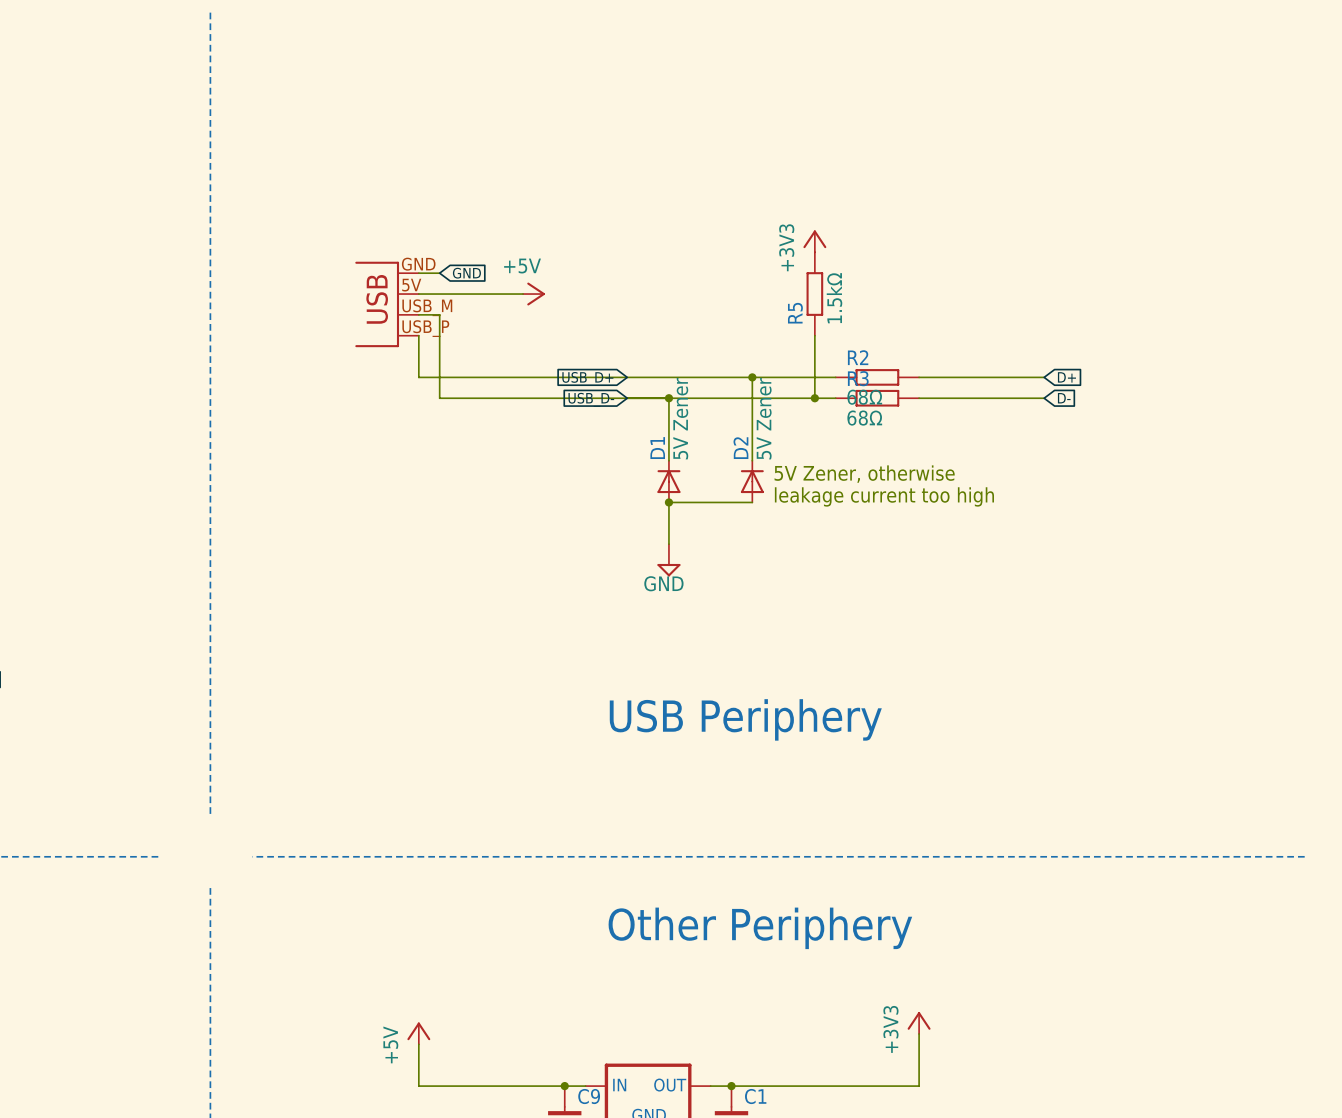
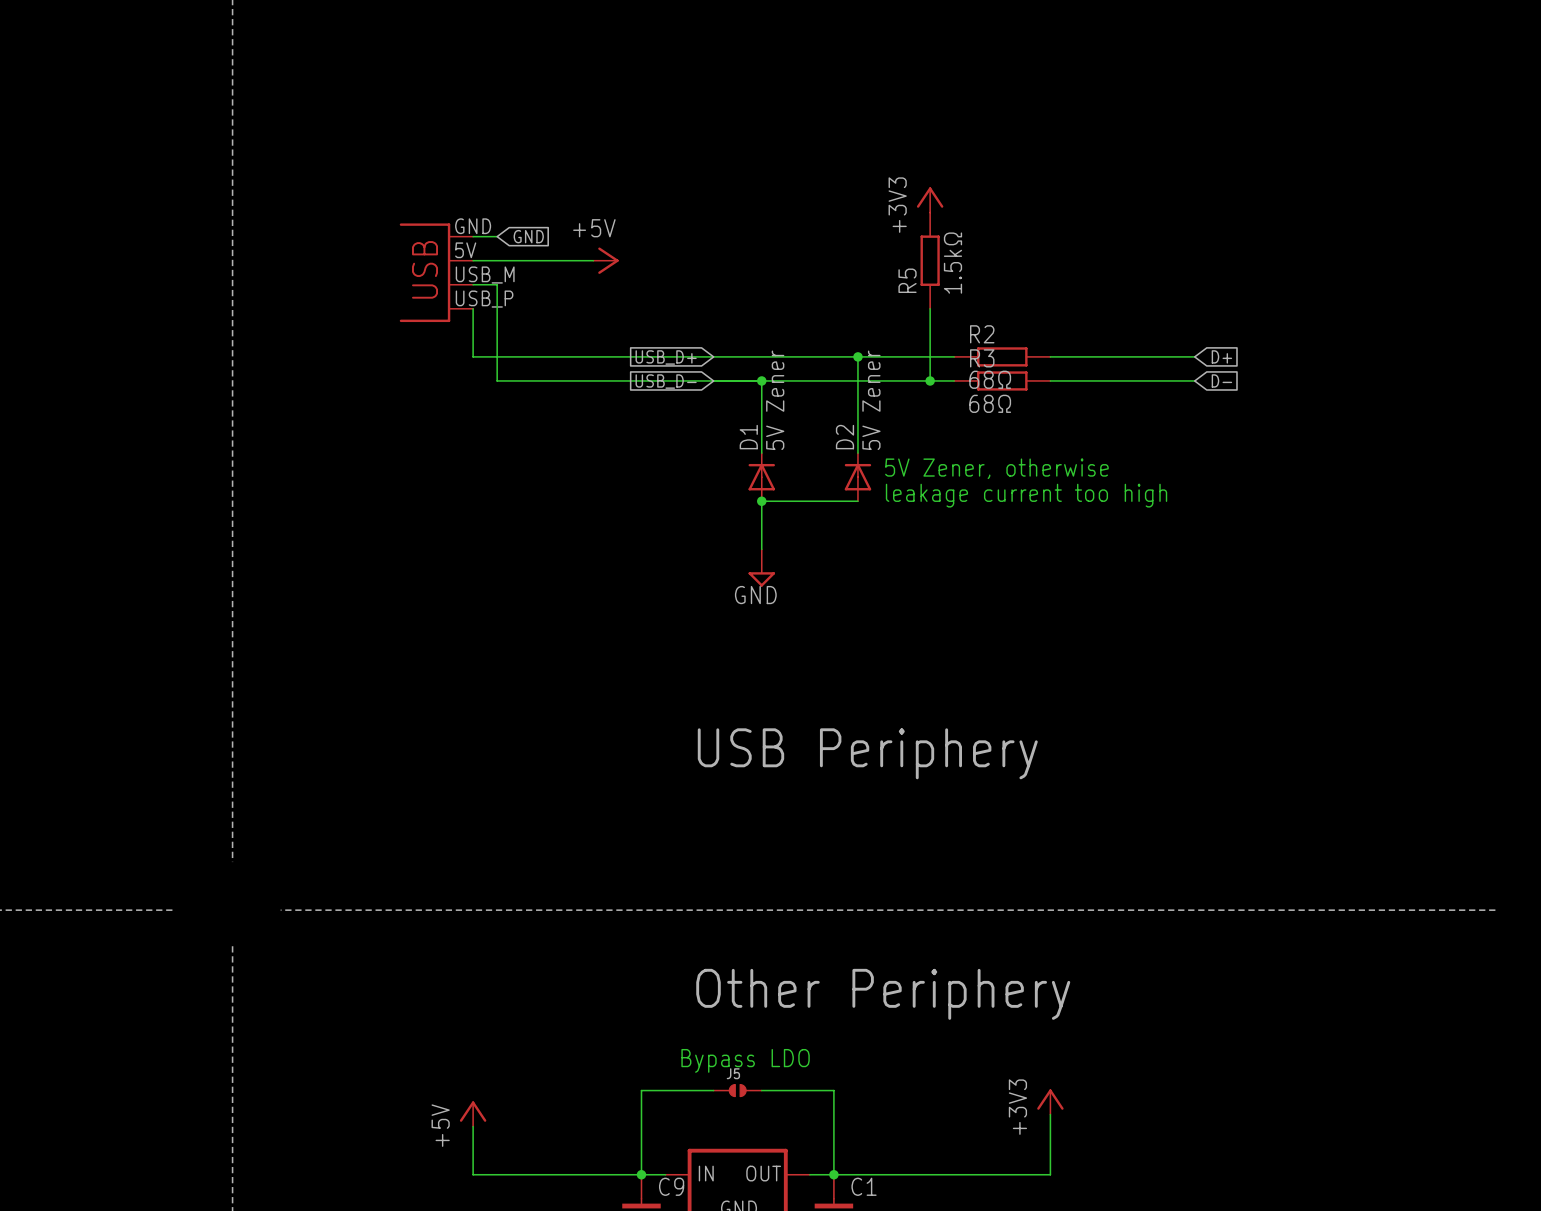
text: none -> Bypass LDO (745, 1060)
wire: none -> (713, 1090) (641, 1090) (641, 1174)
J5: none -> (737, 1090)
wire: none -> (761, 1090) (833, 1090) (833, 1174)

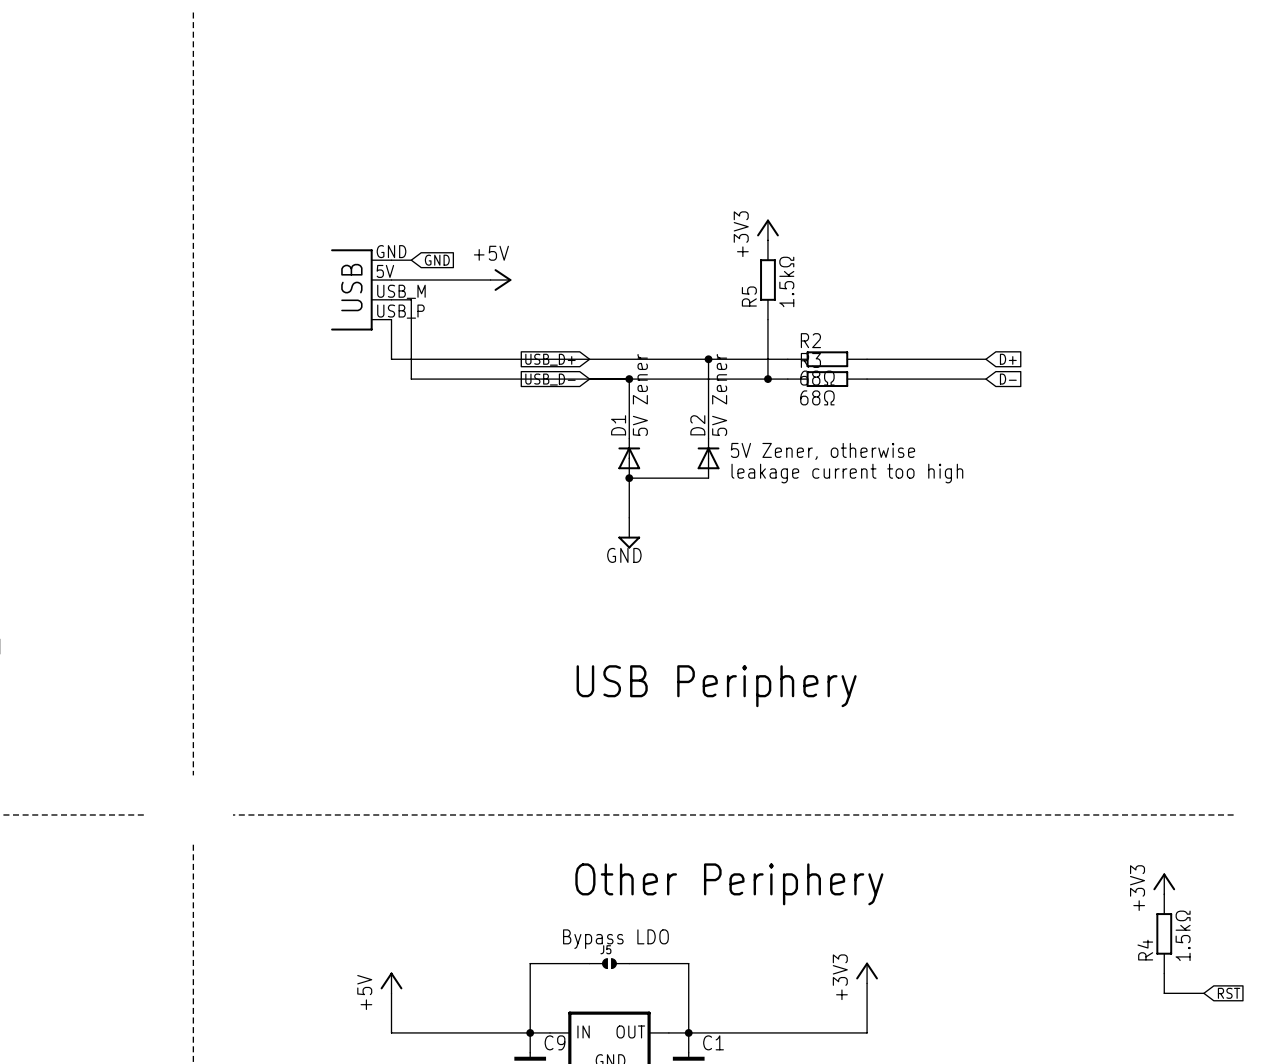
power symbol: none -> +3V3 (1164, 883)
R4: none -> 1.5kΩ (1164, 933)
wire: none -> (1164, 973) (1164, 993) (1203, 993)
global label: none -> RST (1229, 993)

